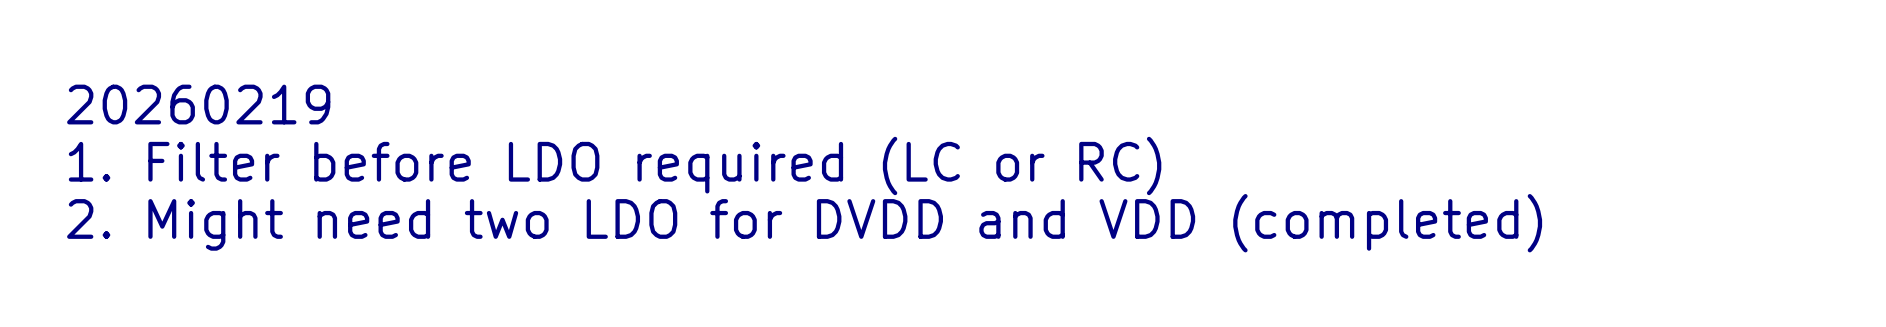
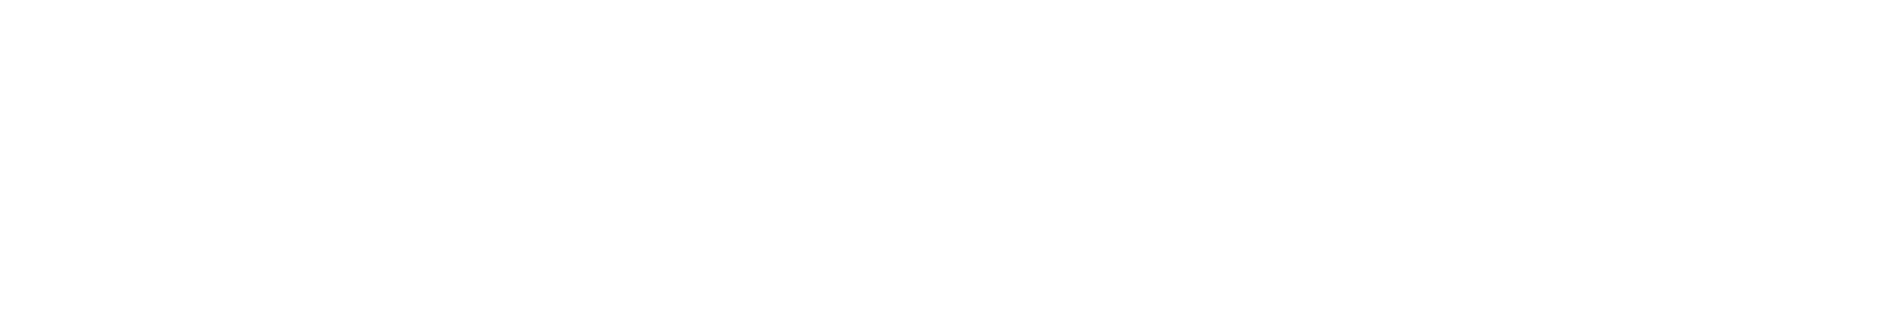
text: 20260219 (198, 104) -> none
text: 1. Filter before LDO required (LC or RC) (615, 165) -> none
text: 2. Might need two LDO for DVDD and VDD (completed) (804, 223) -> none

